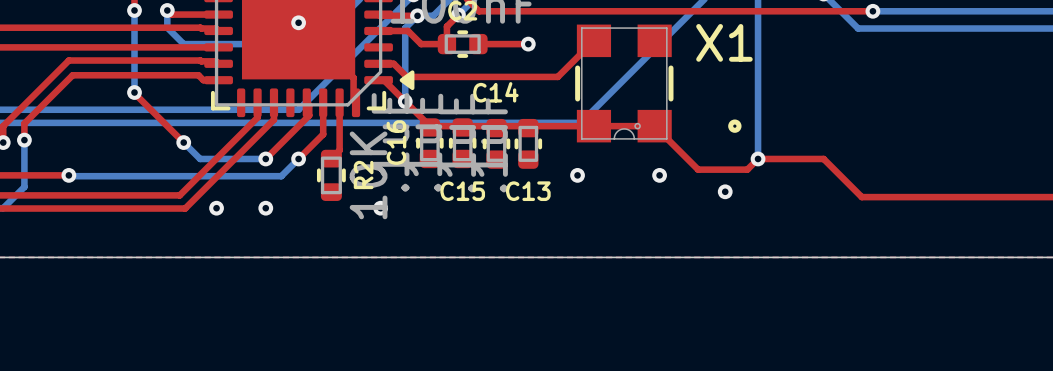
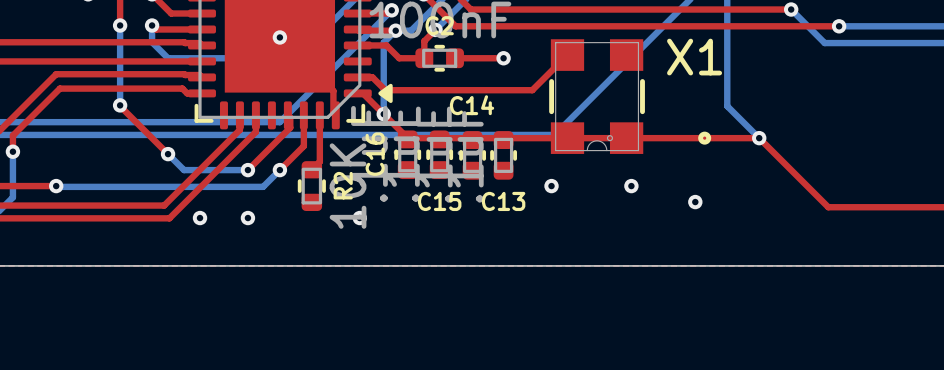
bottom track: (758, 93) (758, 158) -> (727, 106) (759, 138)
top track: (654, 126) (698, 169) (747, 169) (758, 158) (823, 158) -> (626, 138) (759, 138) (791, 170)
via position: (758, 158) -> (759, 138)

